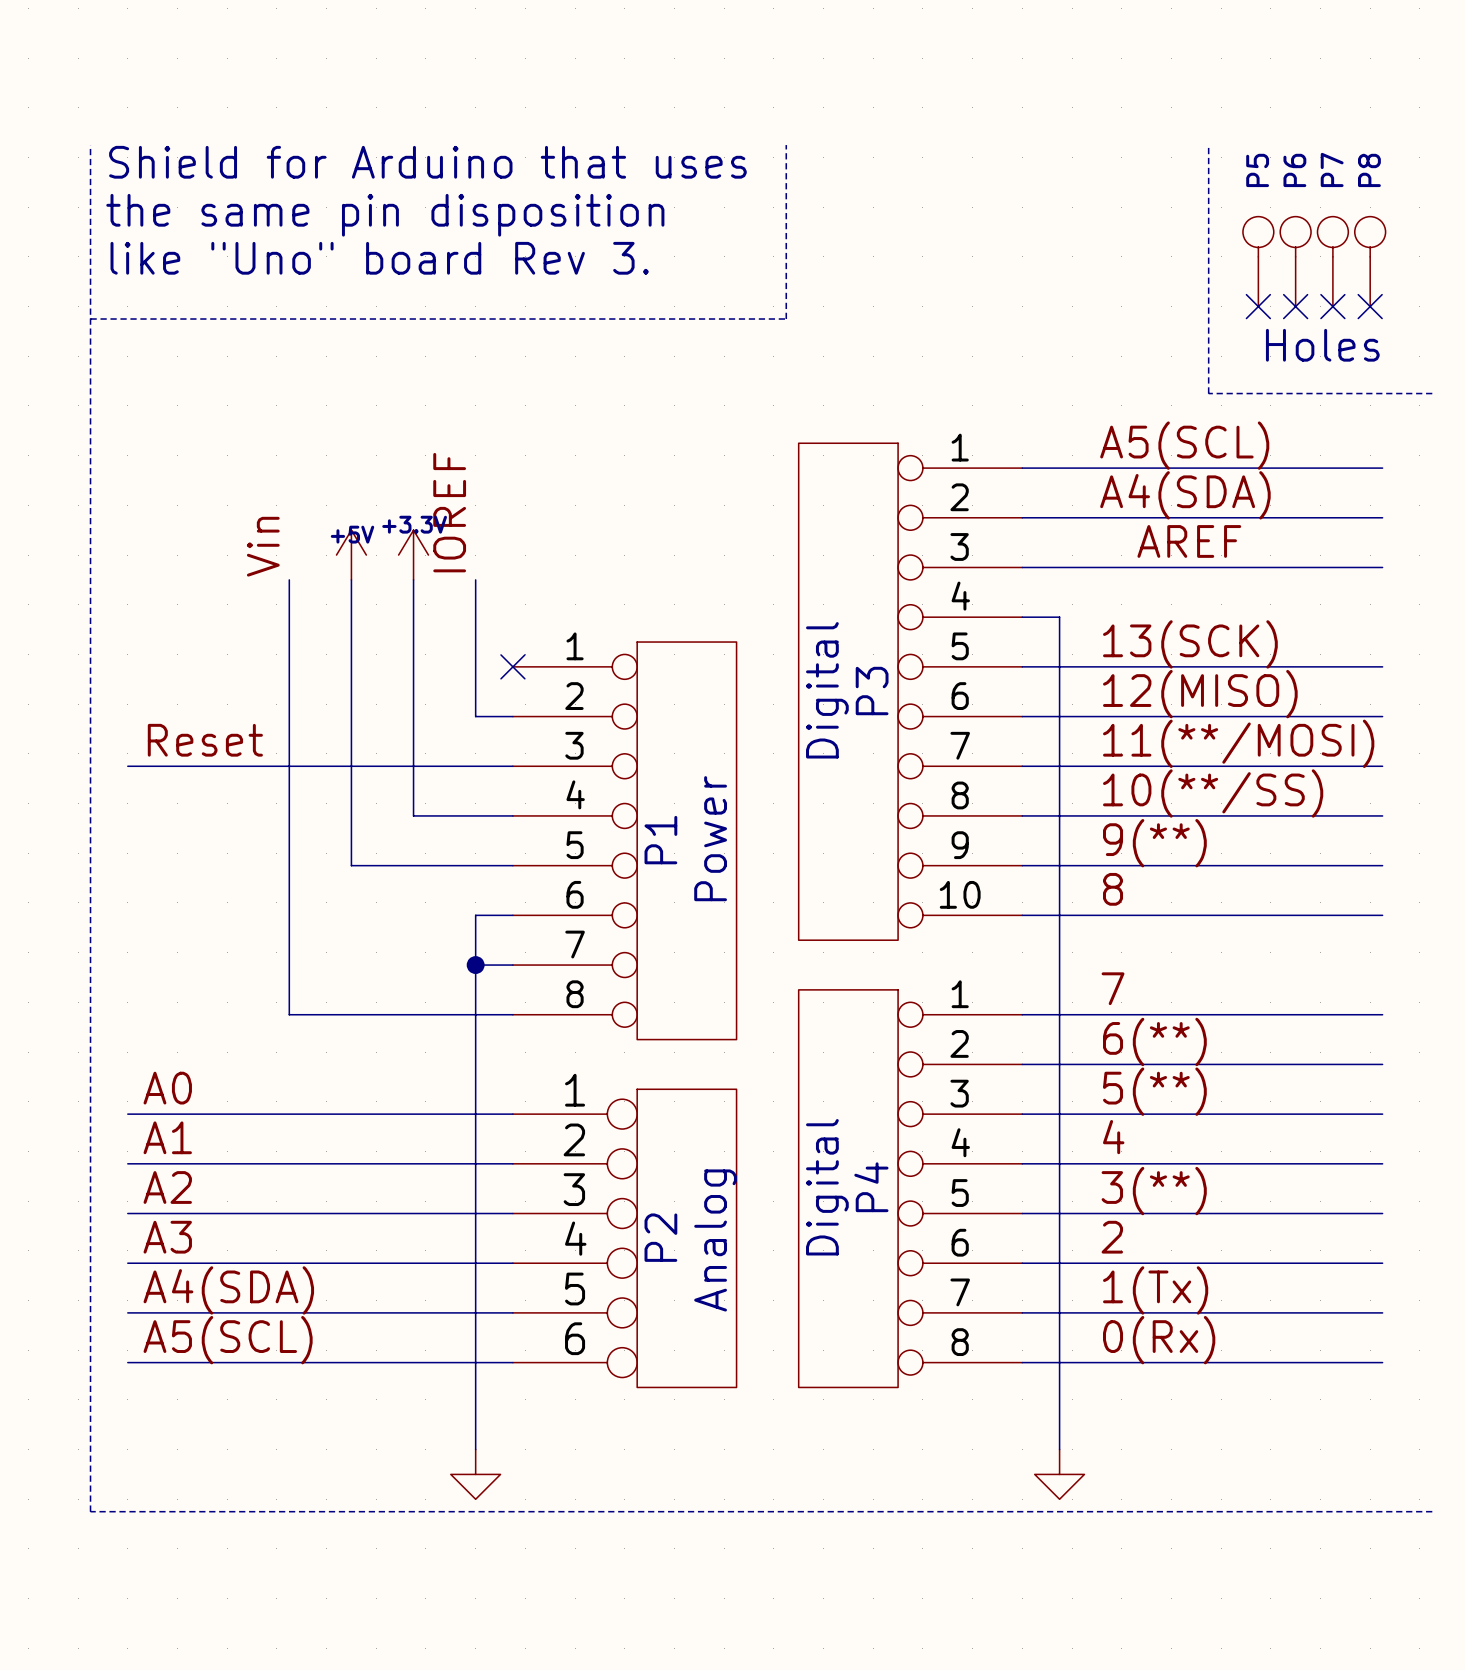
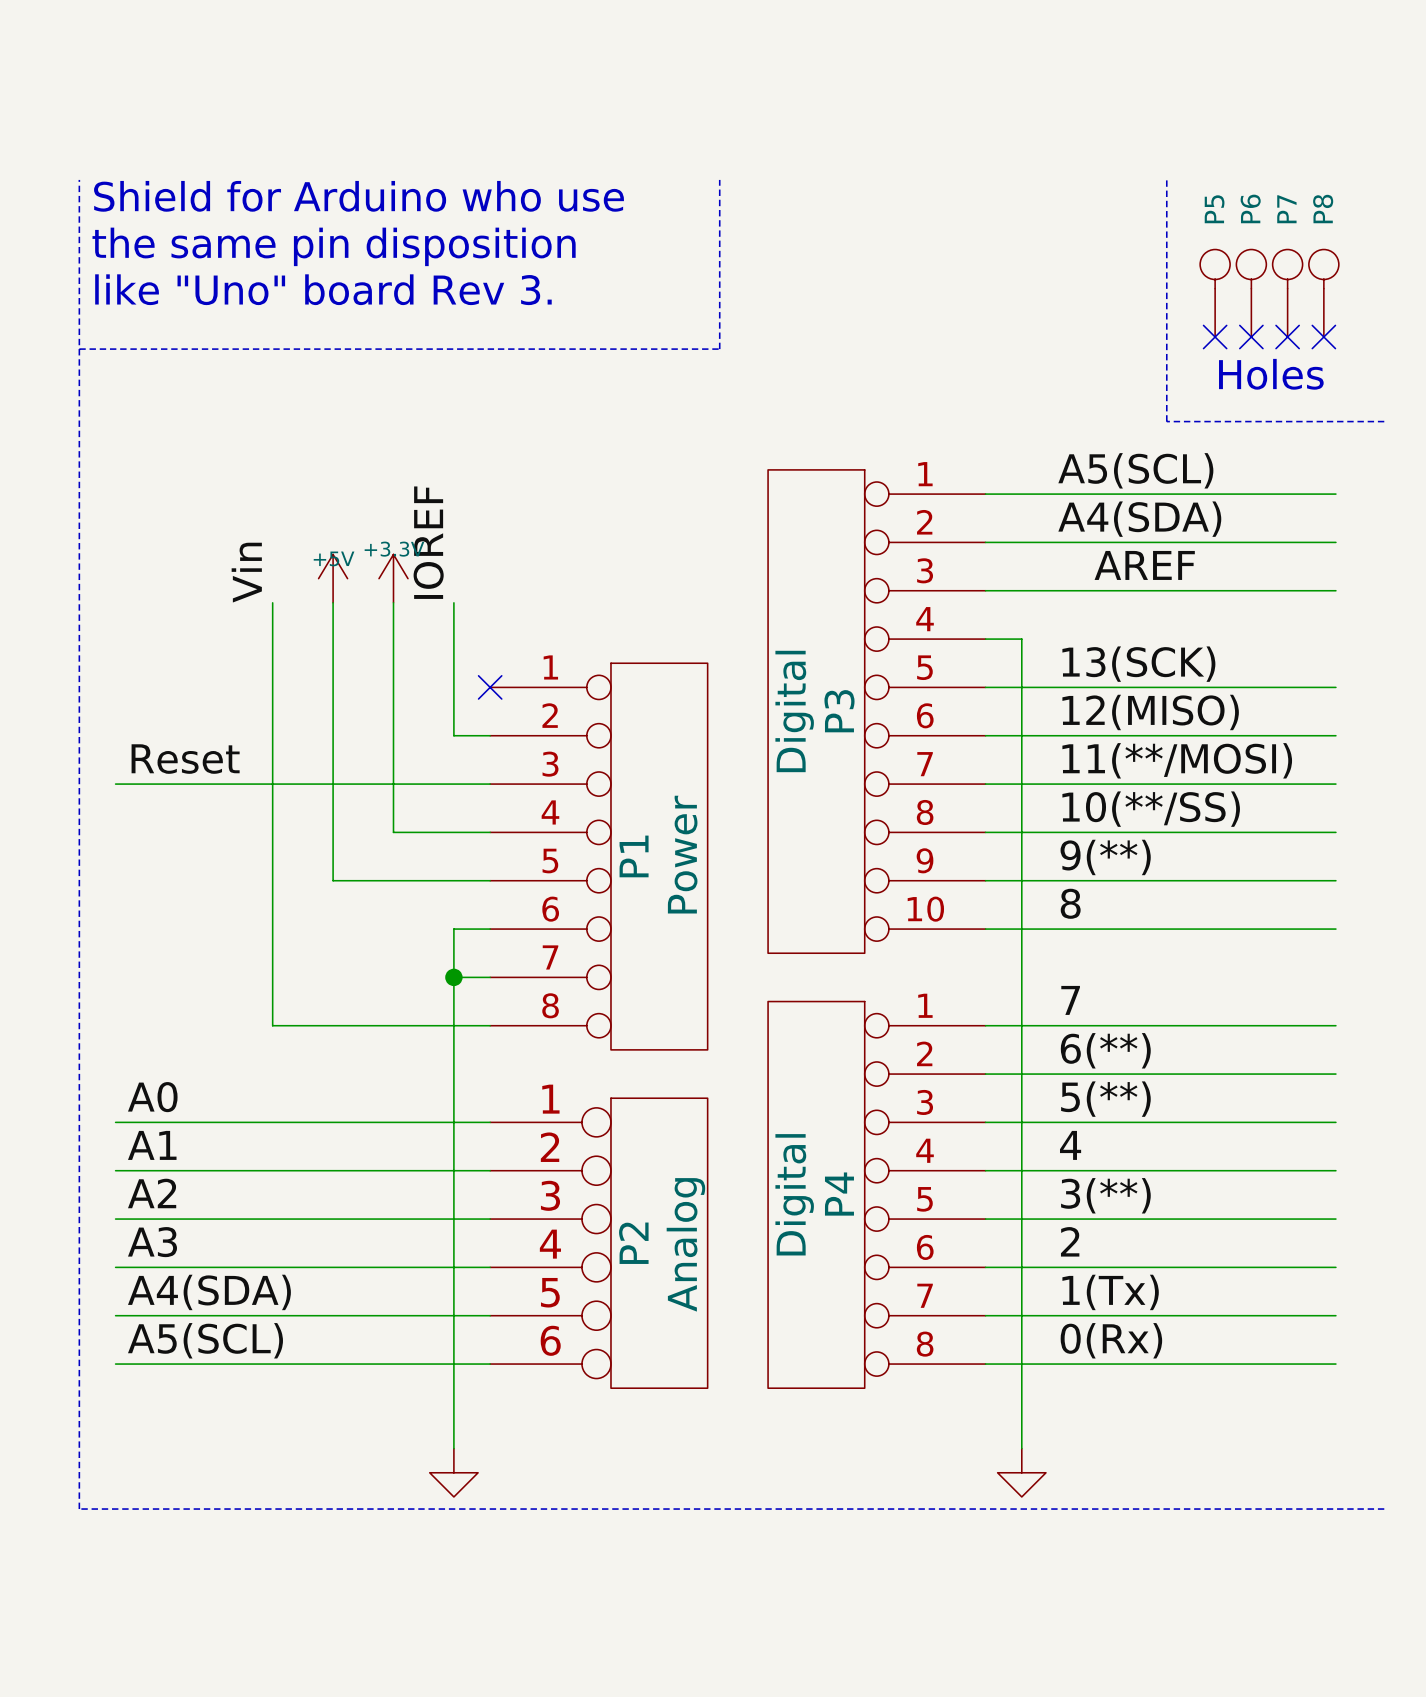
line: (786, 145) (786, 319) (748, 319) -> (719, 179) (719, 349)
text: Shield for Arduino that uses (427, 162) -> Shield for Arduino who use (359, 196)

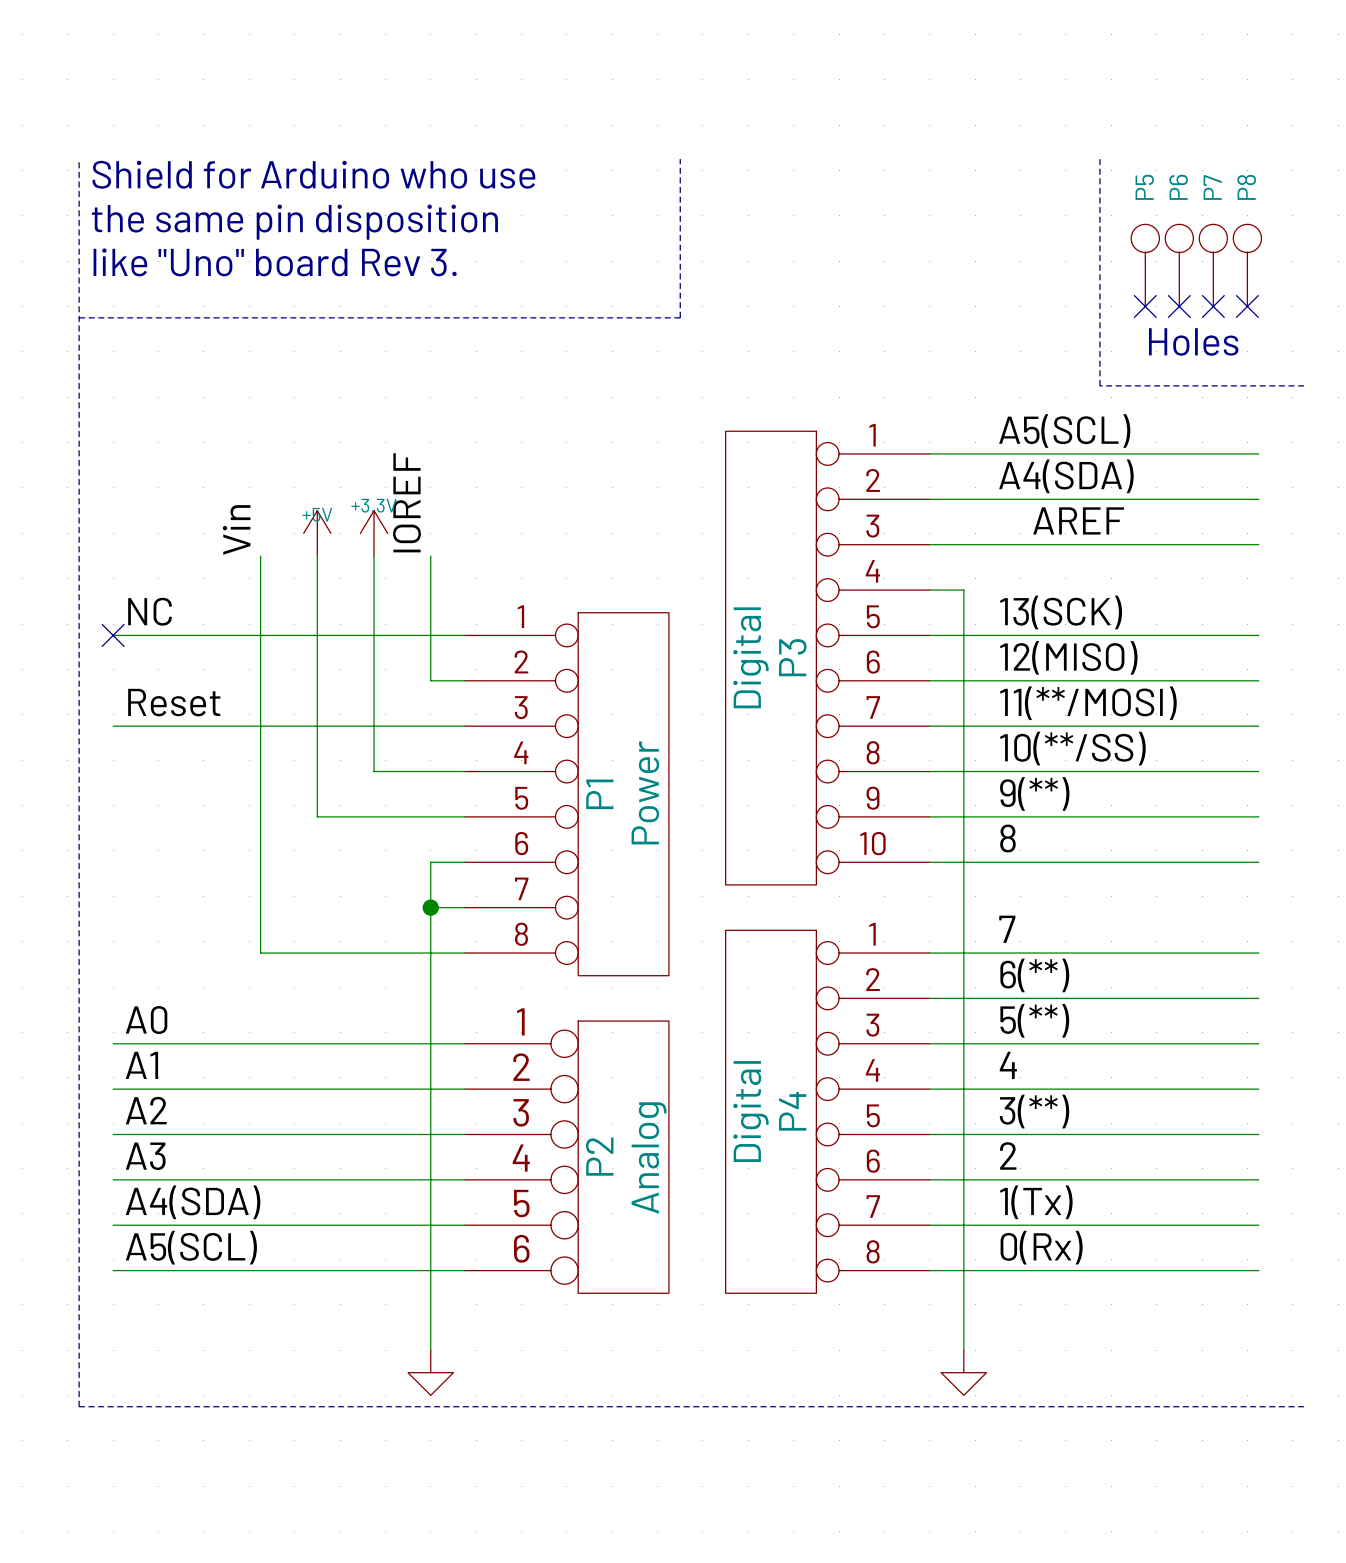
label: none -> NC (150, 611)
wire: none -> (113, 635) (464, 635)
no-connect mark: none -> (113, 635)
no-connect mark: (490, 687) -> none

